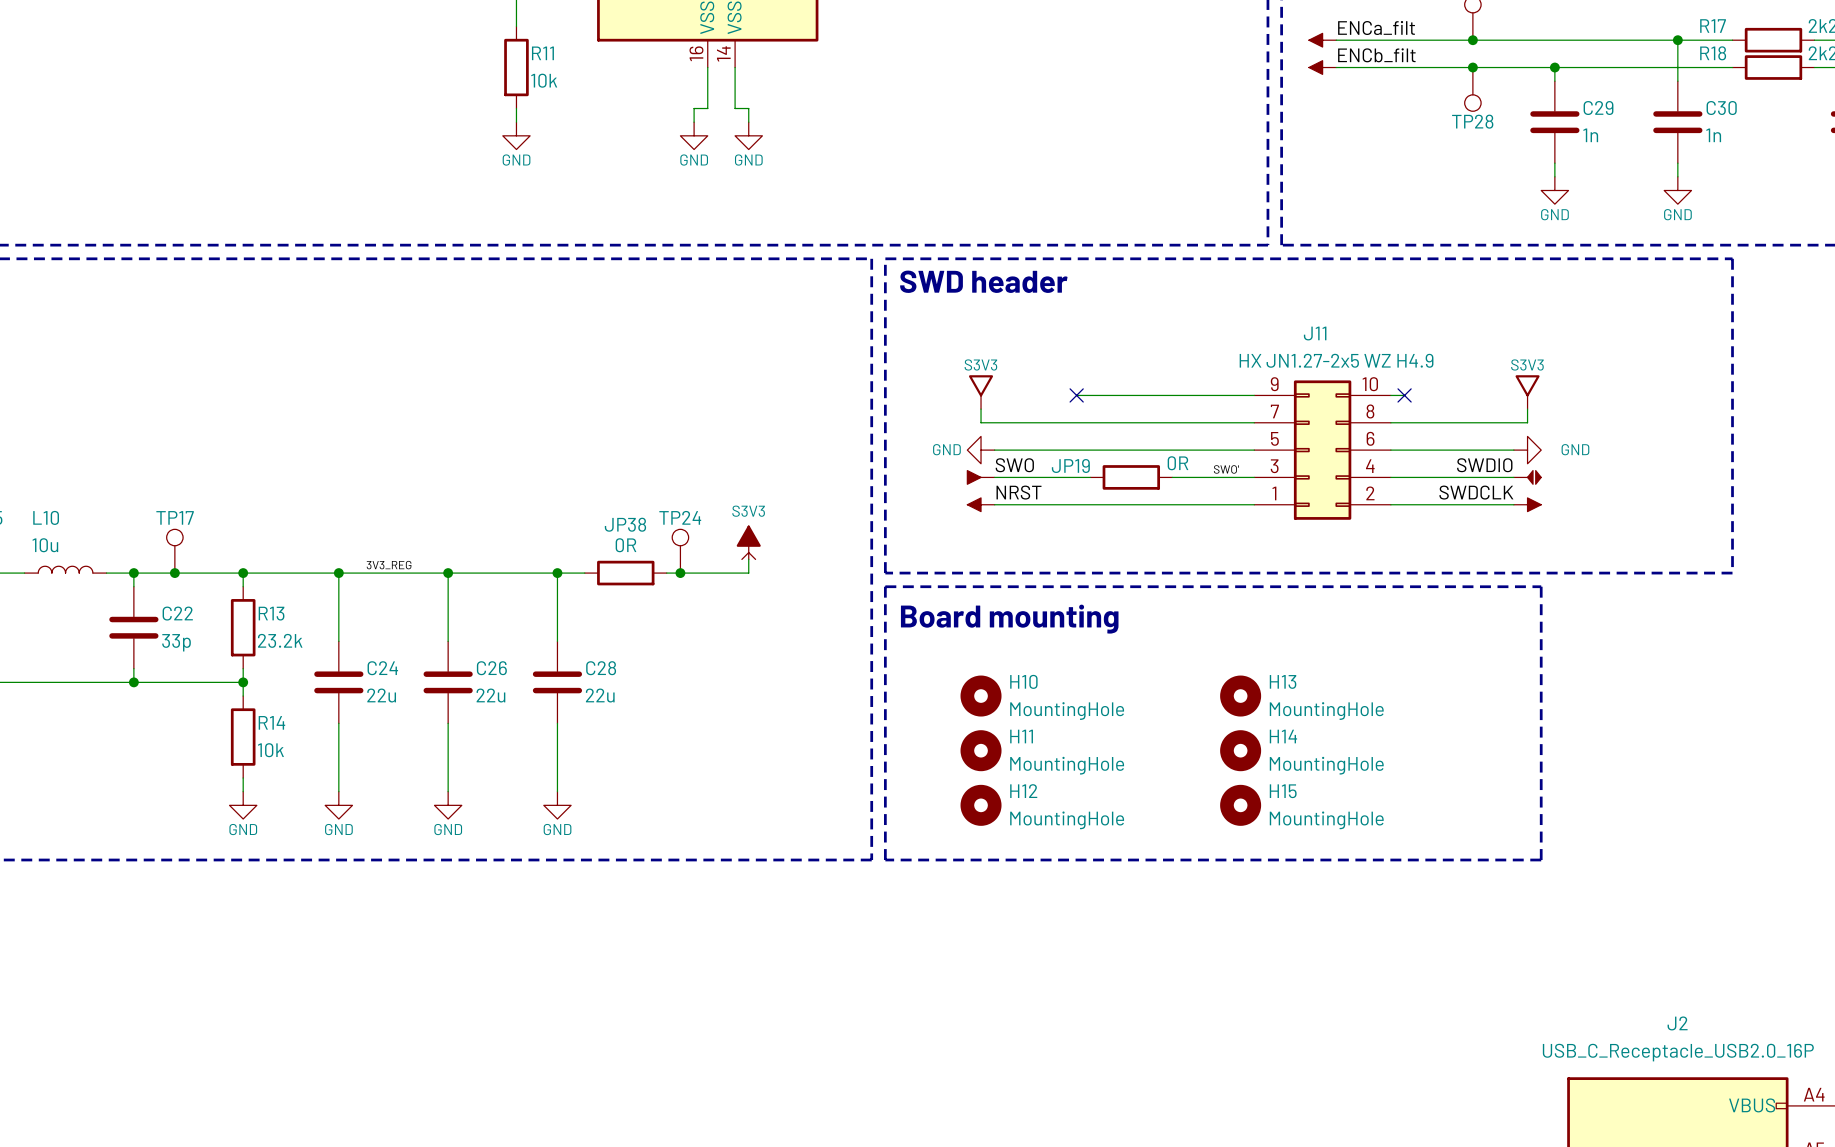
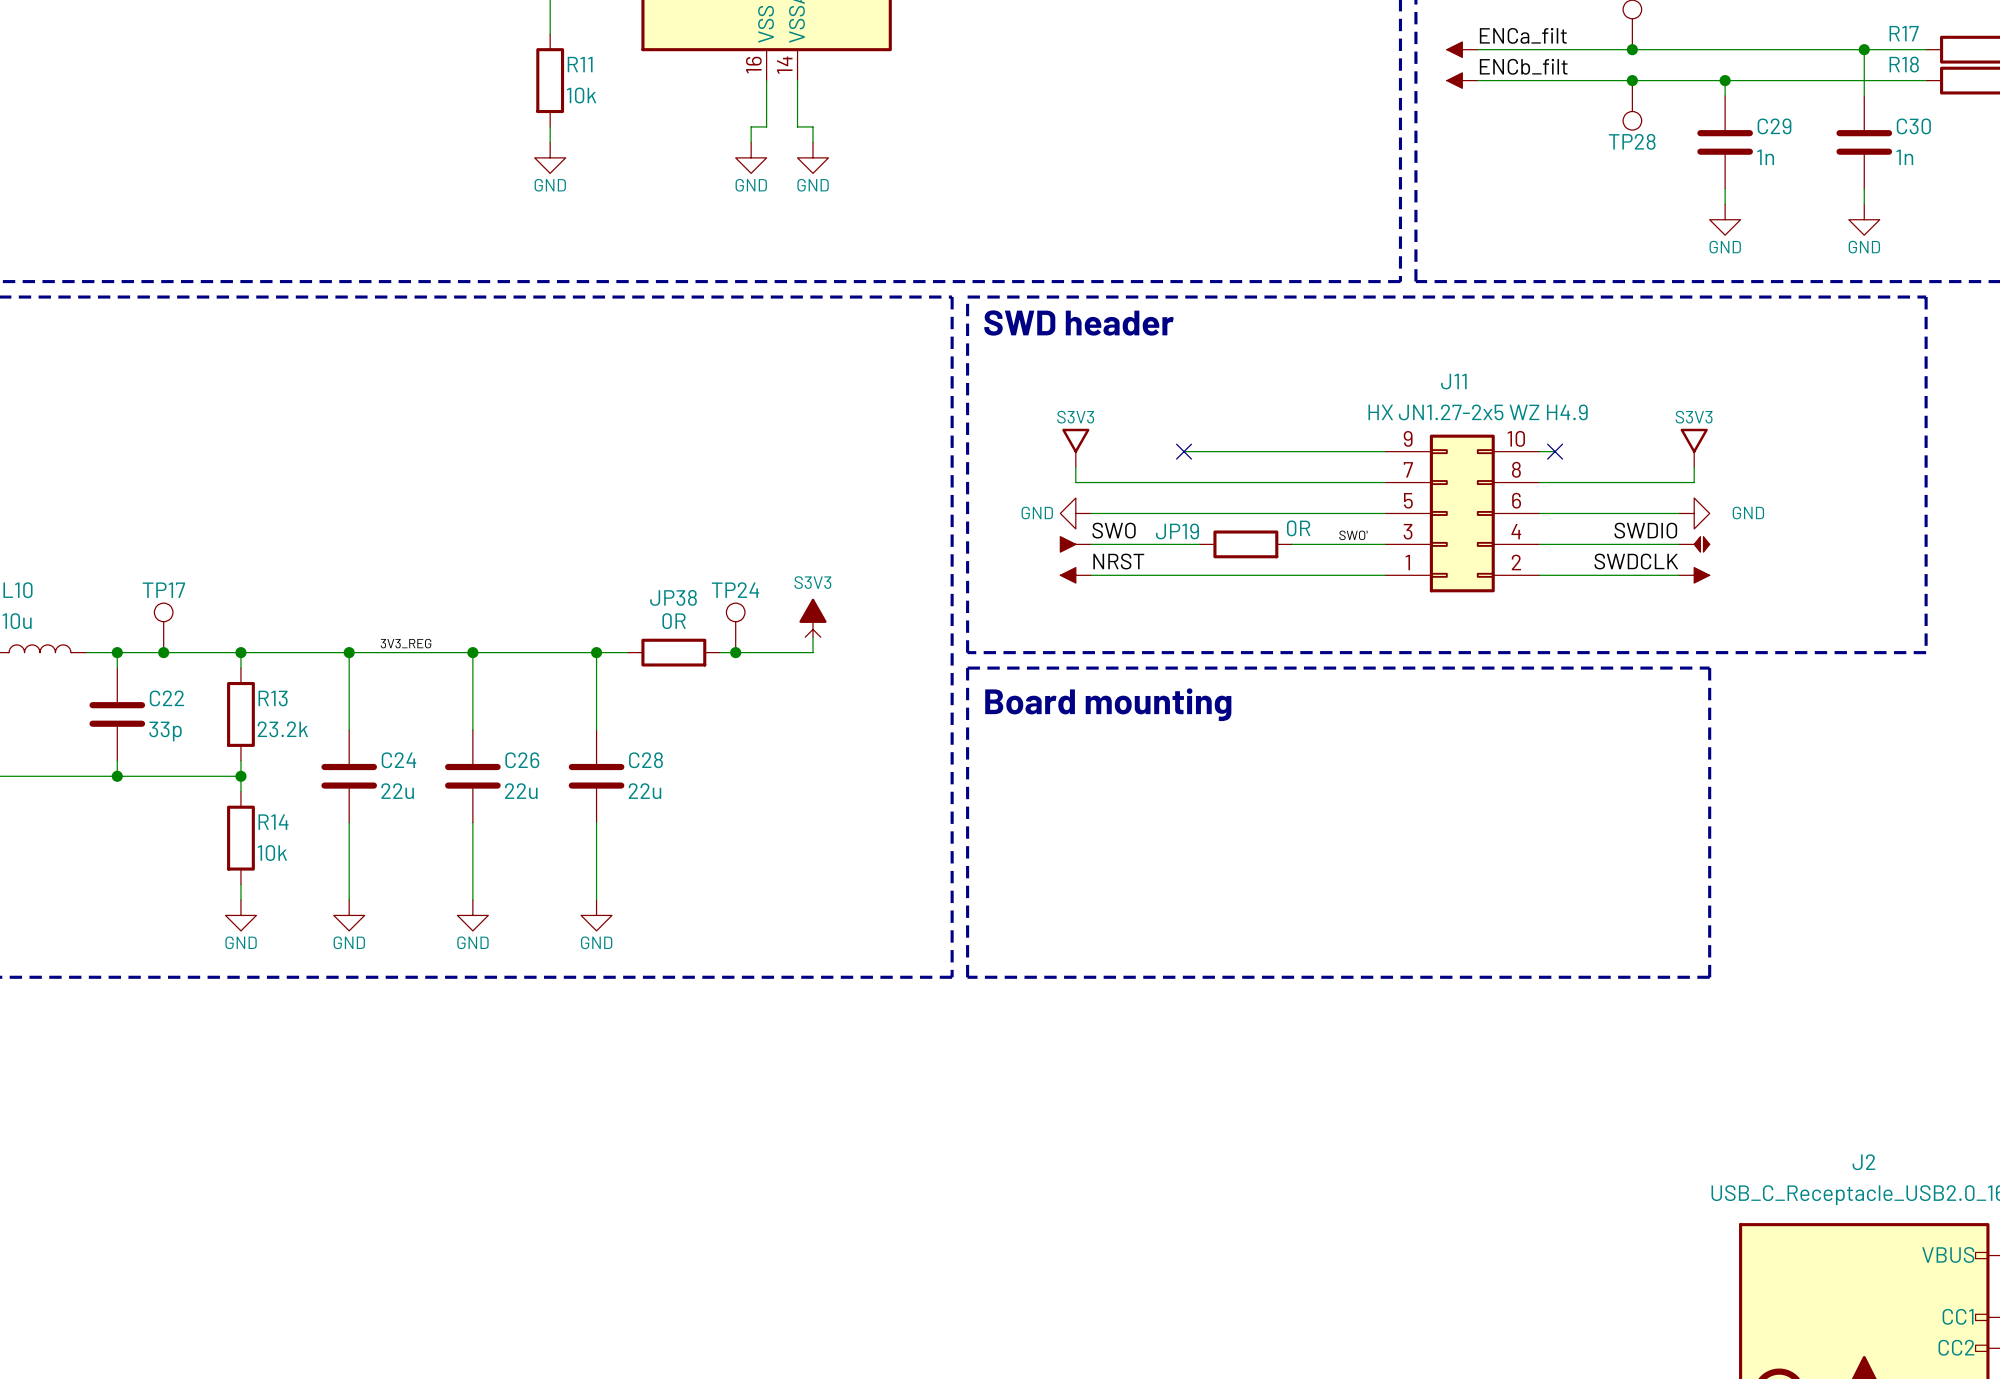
H10: MountingHole (981, 696) -> none
H13: MountingHole (1240, 696) -> none
H11: MountingHole (981, 750) -> none
H14: MountingHole (1240, 750) -> none
H12: MountingHole (981, 805) -> none
H15: MountingHole (1240, 805) -> none

